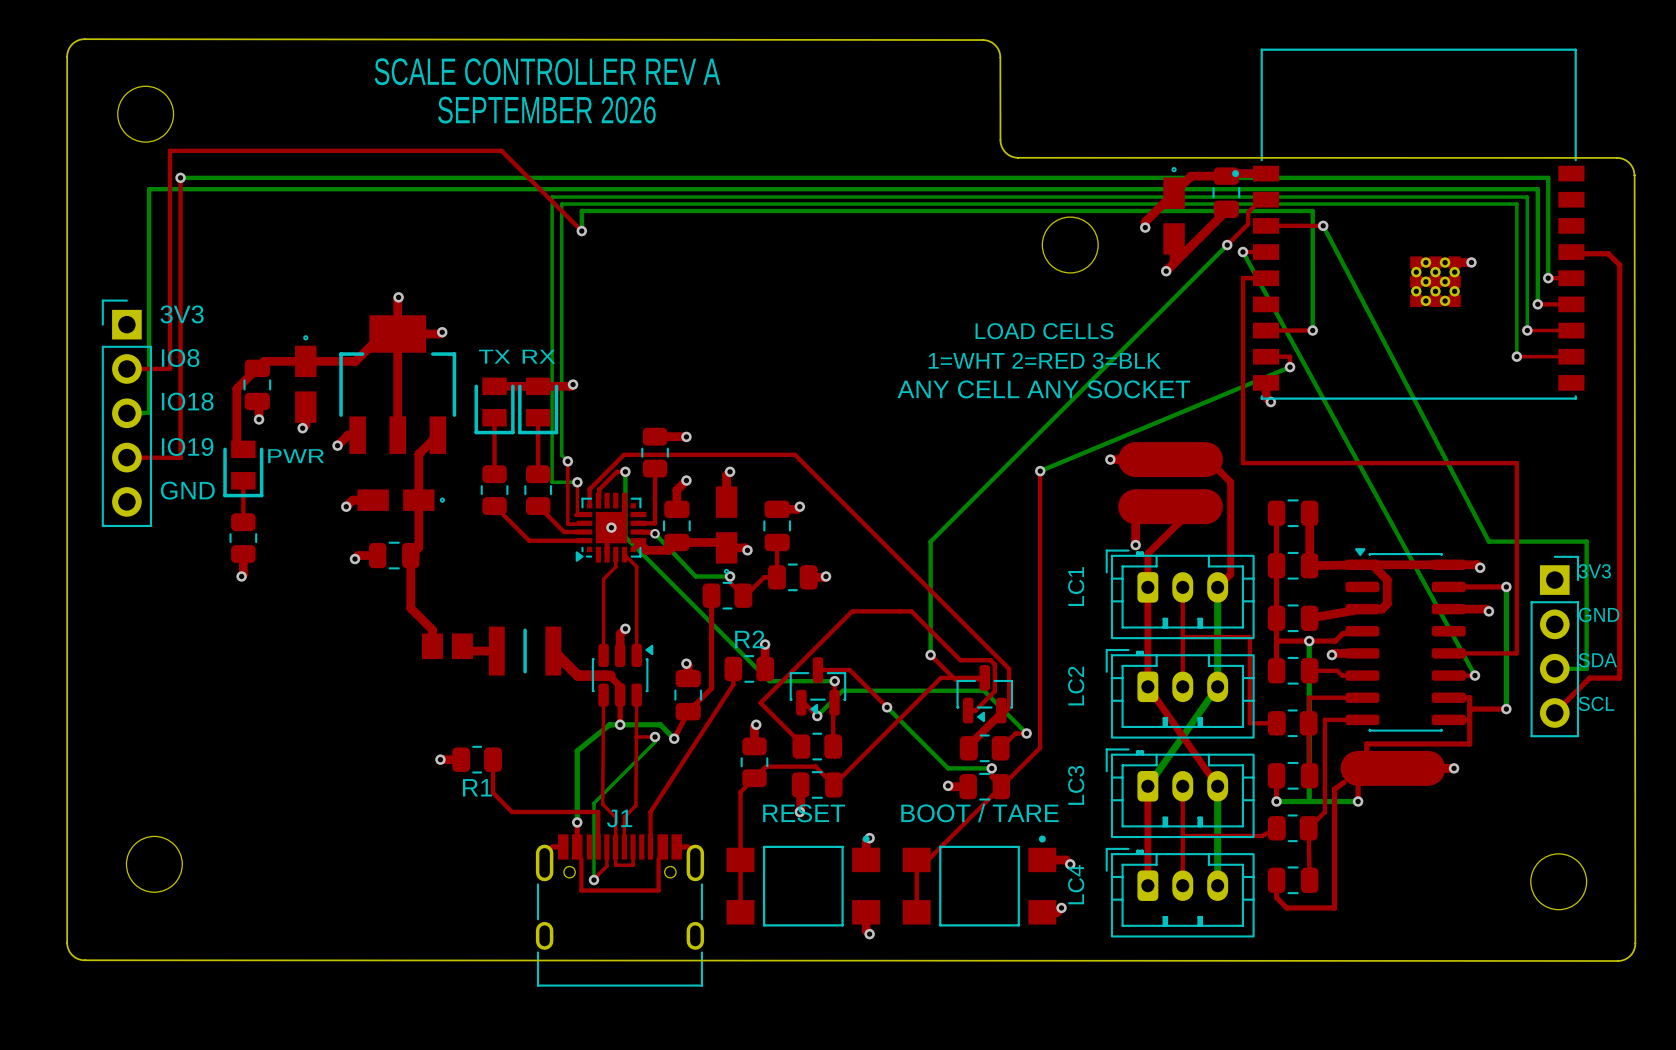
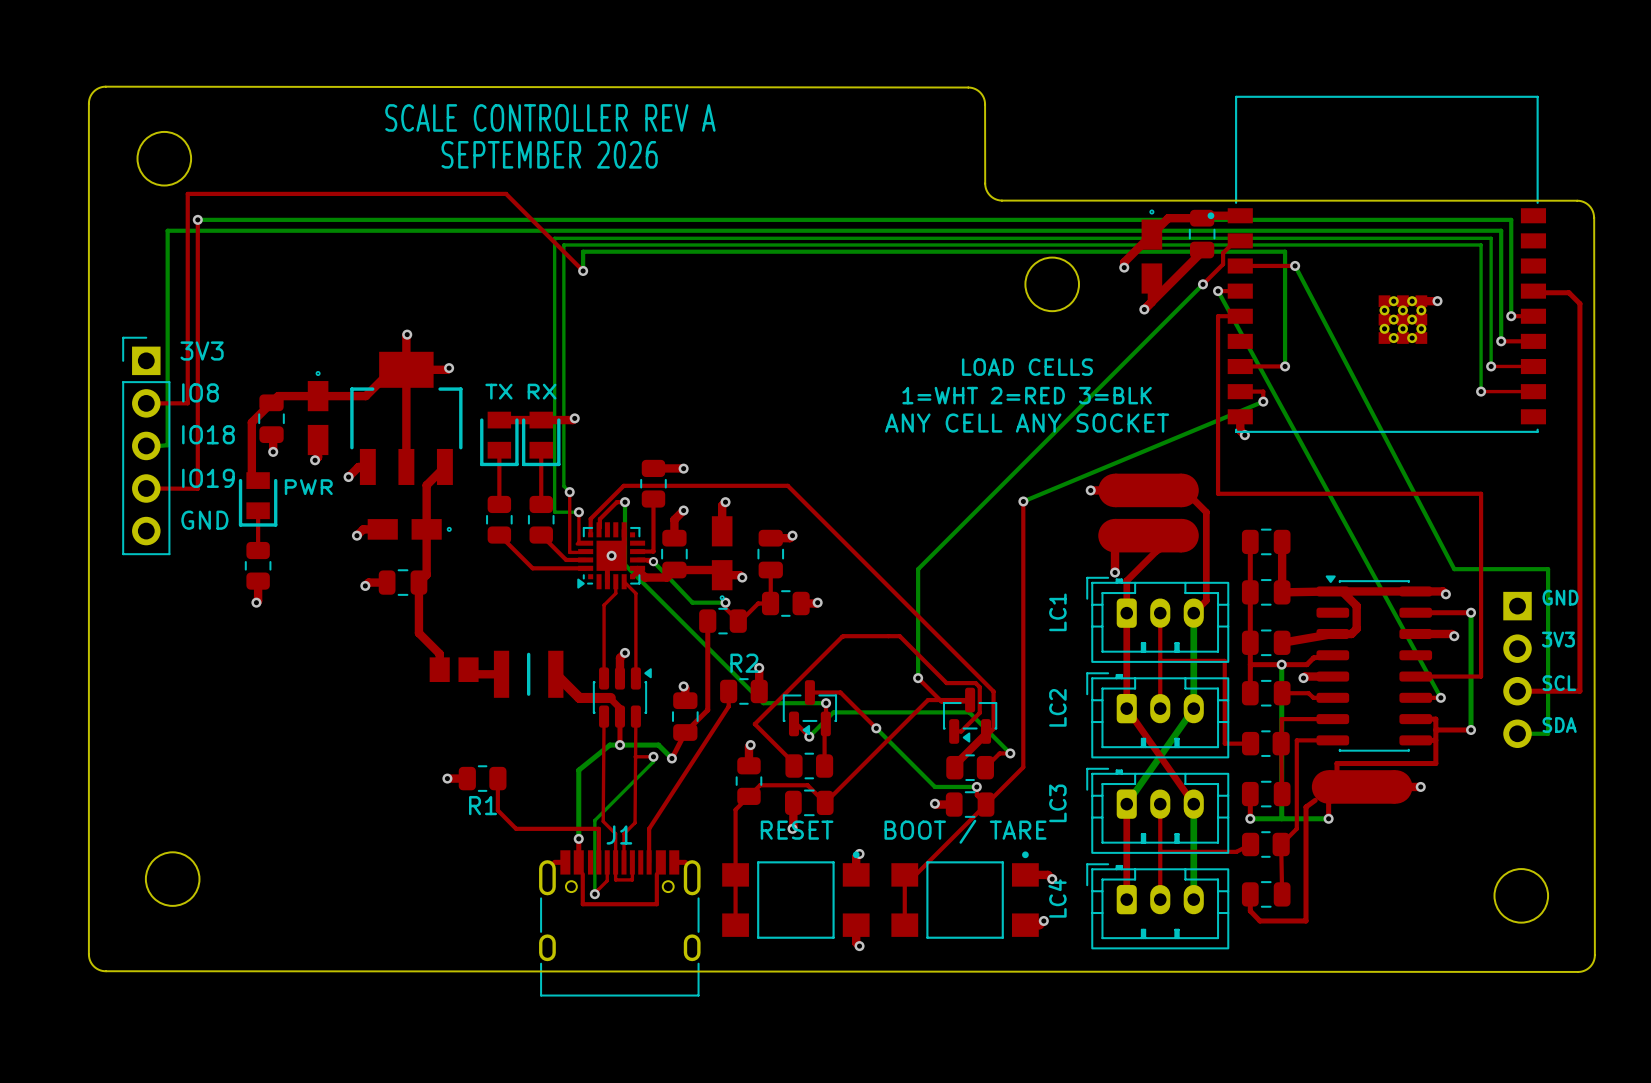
text: 3V3 (1594, 571) -> GND (1560, 597)
text: GND (1599, 614) -> 3V3 (1558, 639)
part side: top (1554, 646) -> bottom (1517, 669)
text: SDA (1597, 660) -> SCL (1559, 683)
bottom track: (1554, 668) (1586, 668) -> (1517, 733) (1548, 733) (1548, 691)
top track: (1619, 668) (1619, 678) (1589, 678) (1554, 712) -> (1579, 691) (1517, 691)
text: SCL (1596, 703) -> SDA (1559, 725)

